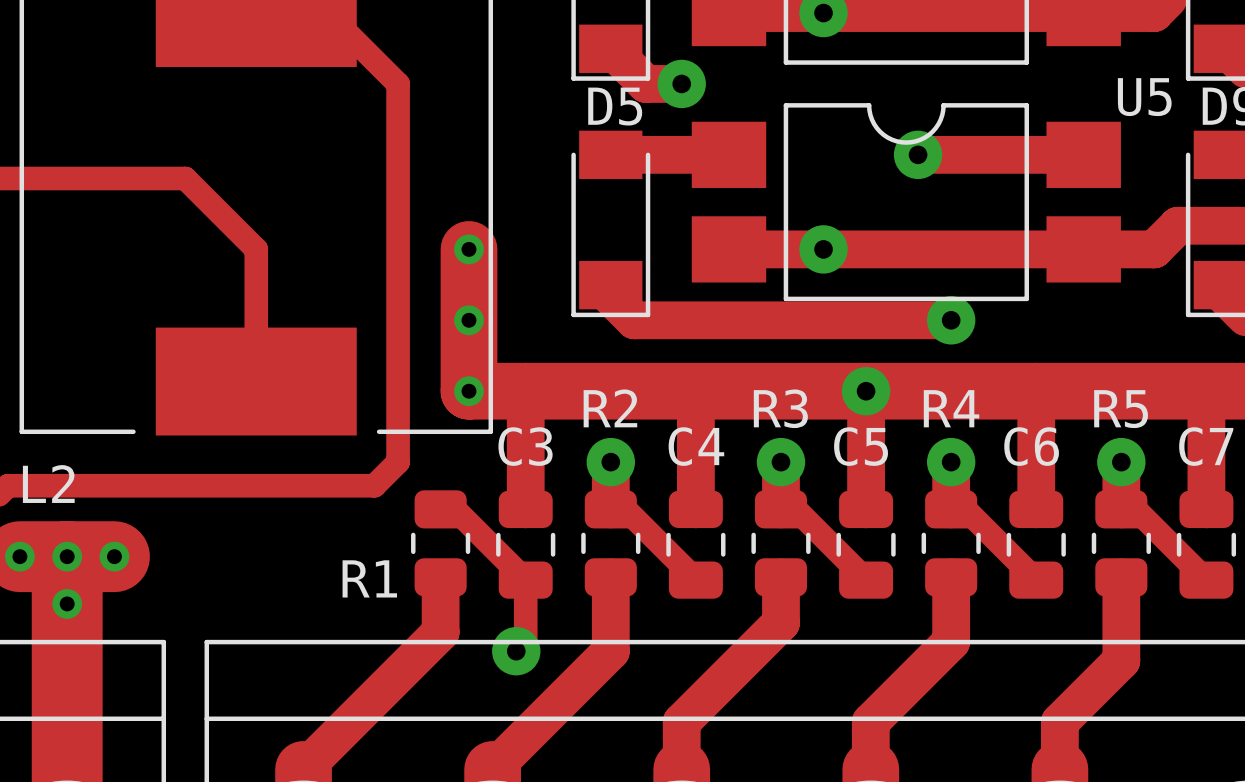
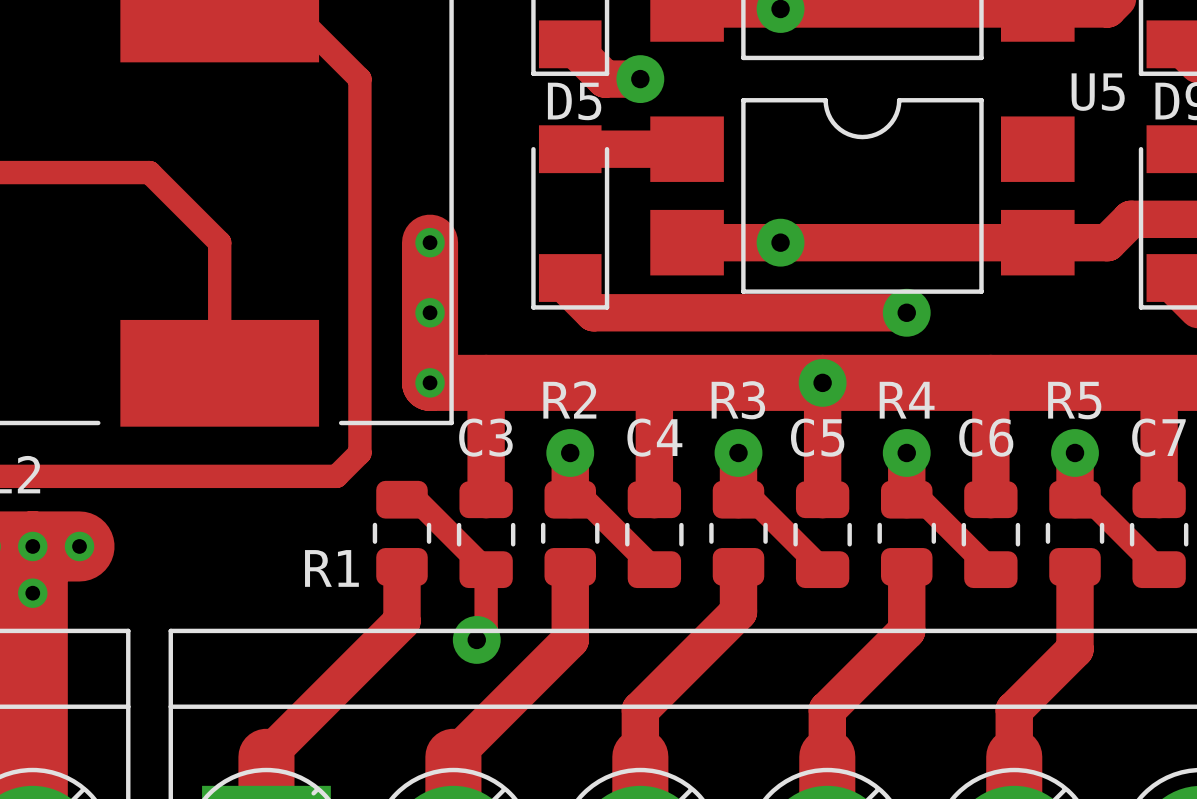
track: (918, 154) (1083, 154) -> none
via: (918, 154) -> none

